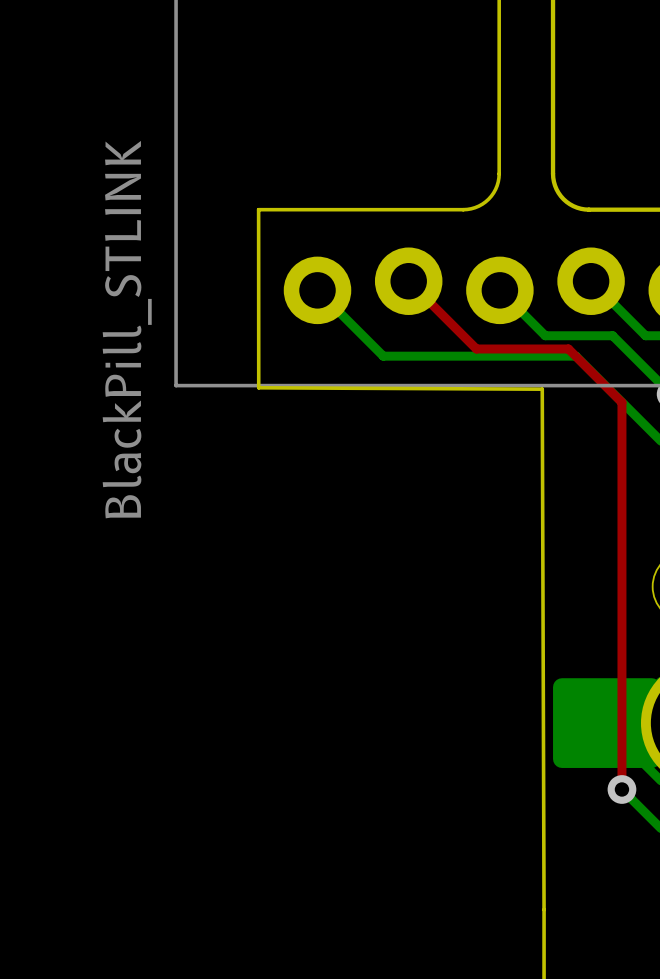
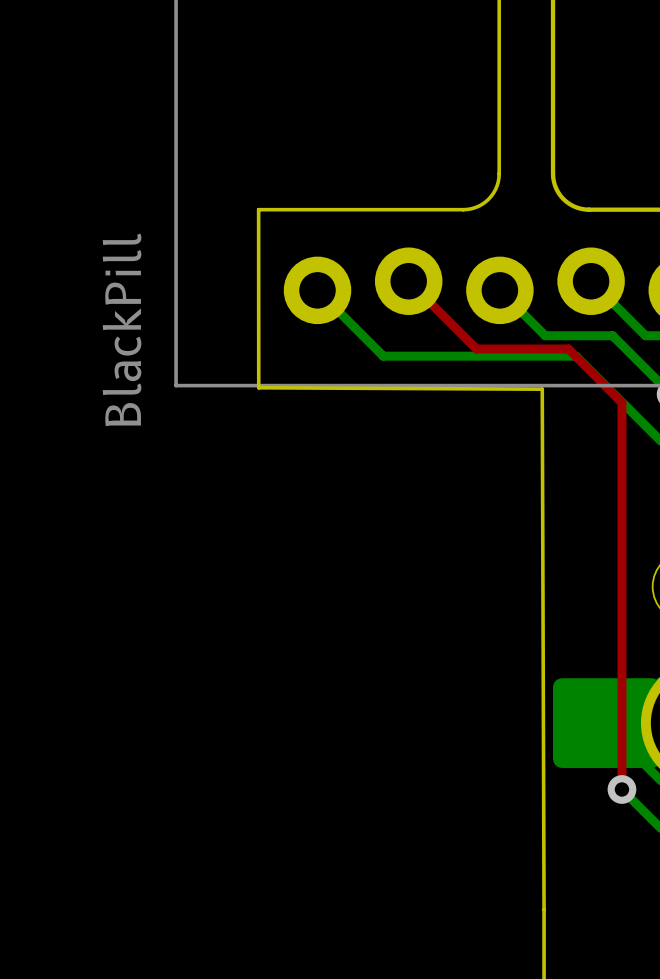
part value: BlackPill_STLINK (127, 329) -> BlackPill (122, 329)

